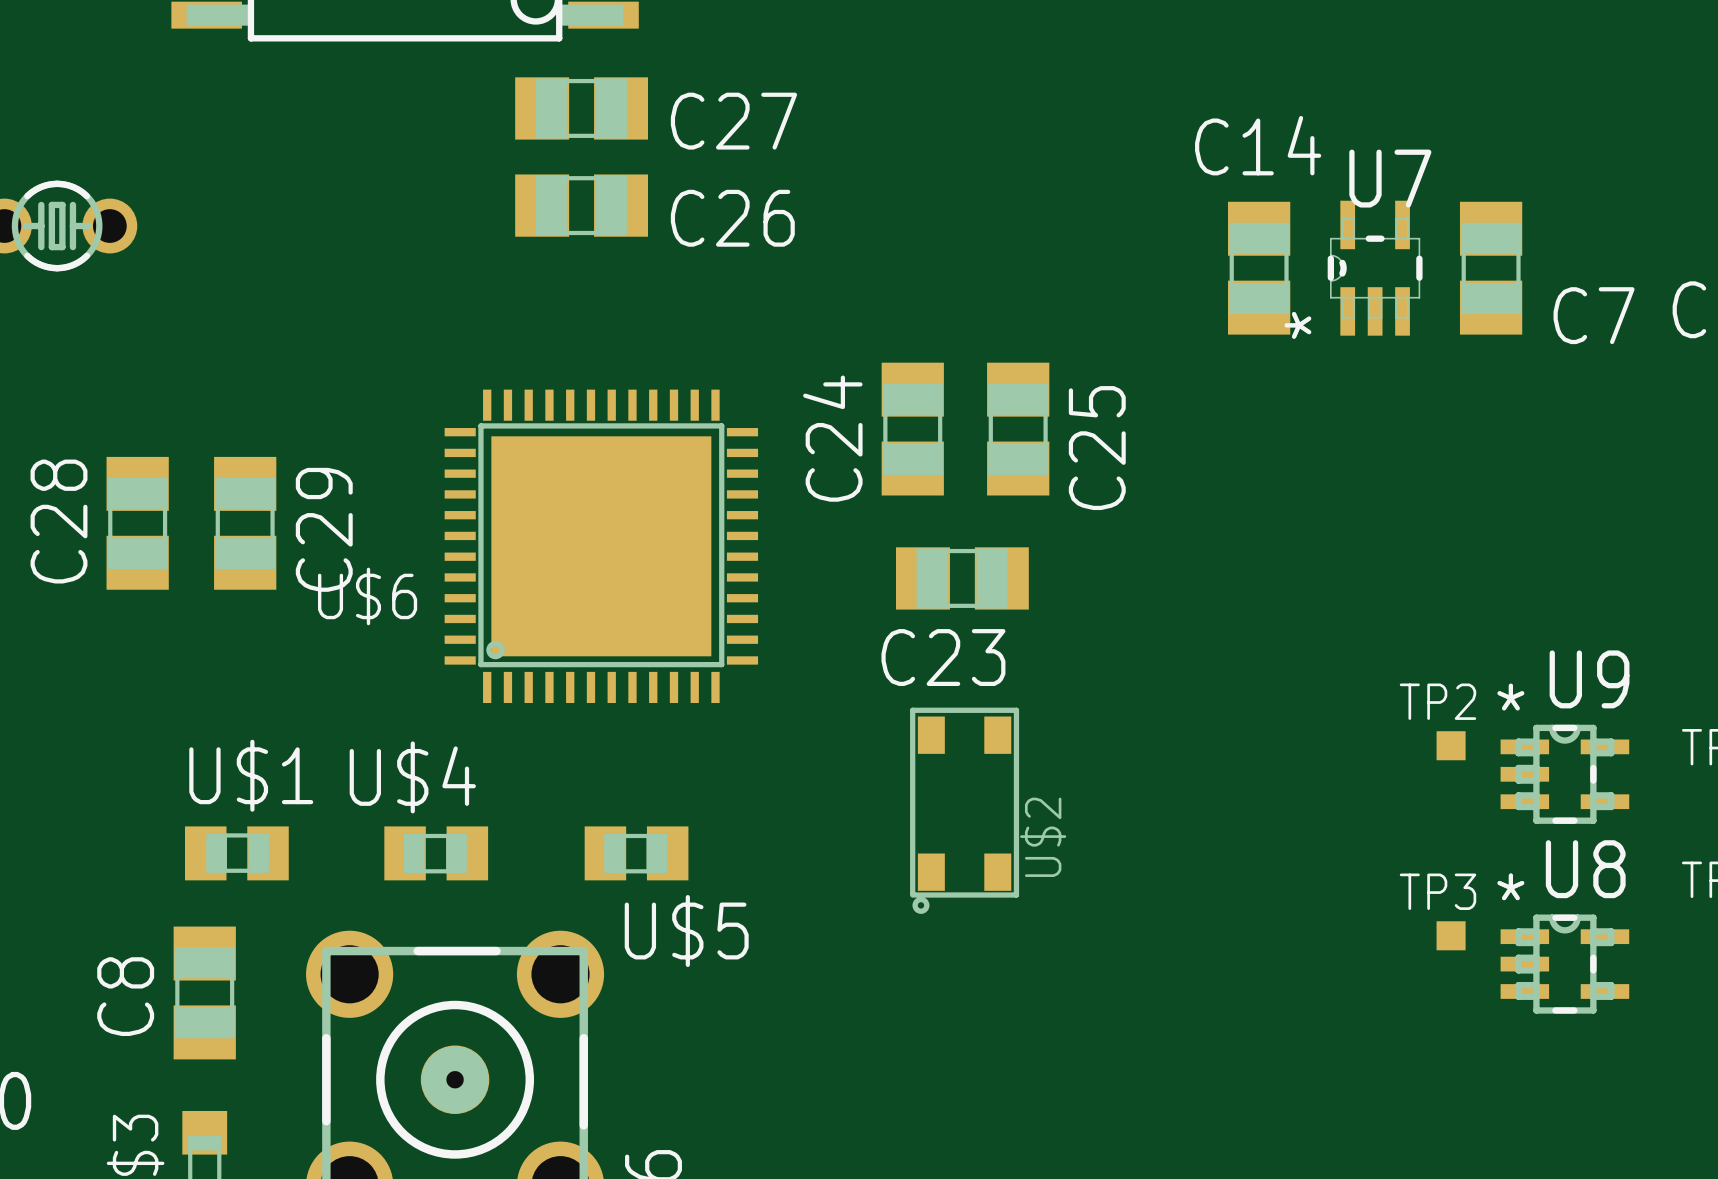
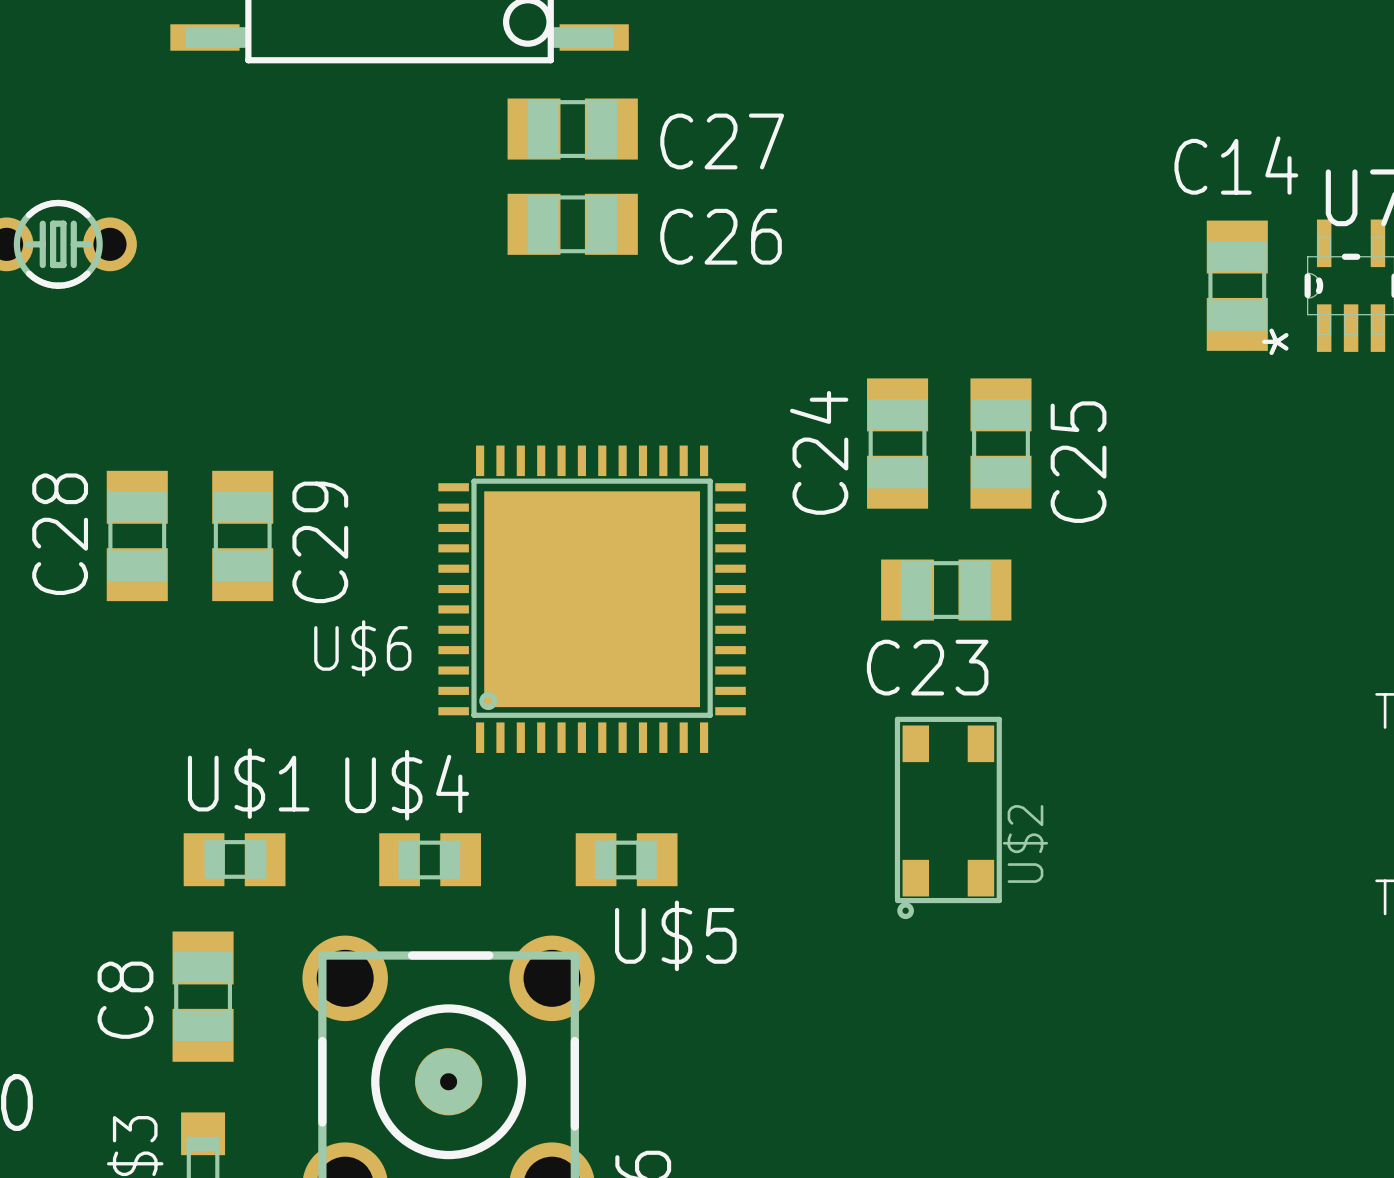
U$6 position: (601, 546) -> (592, 599)

